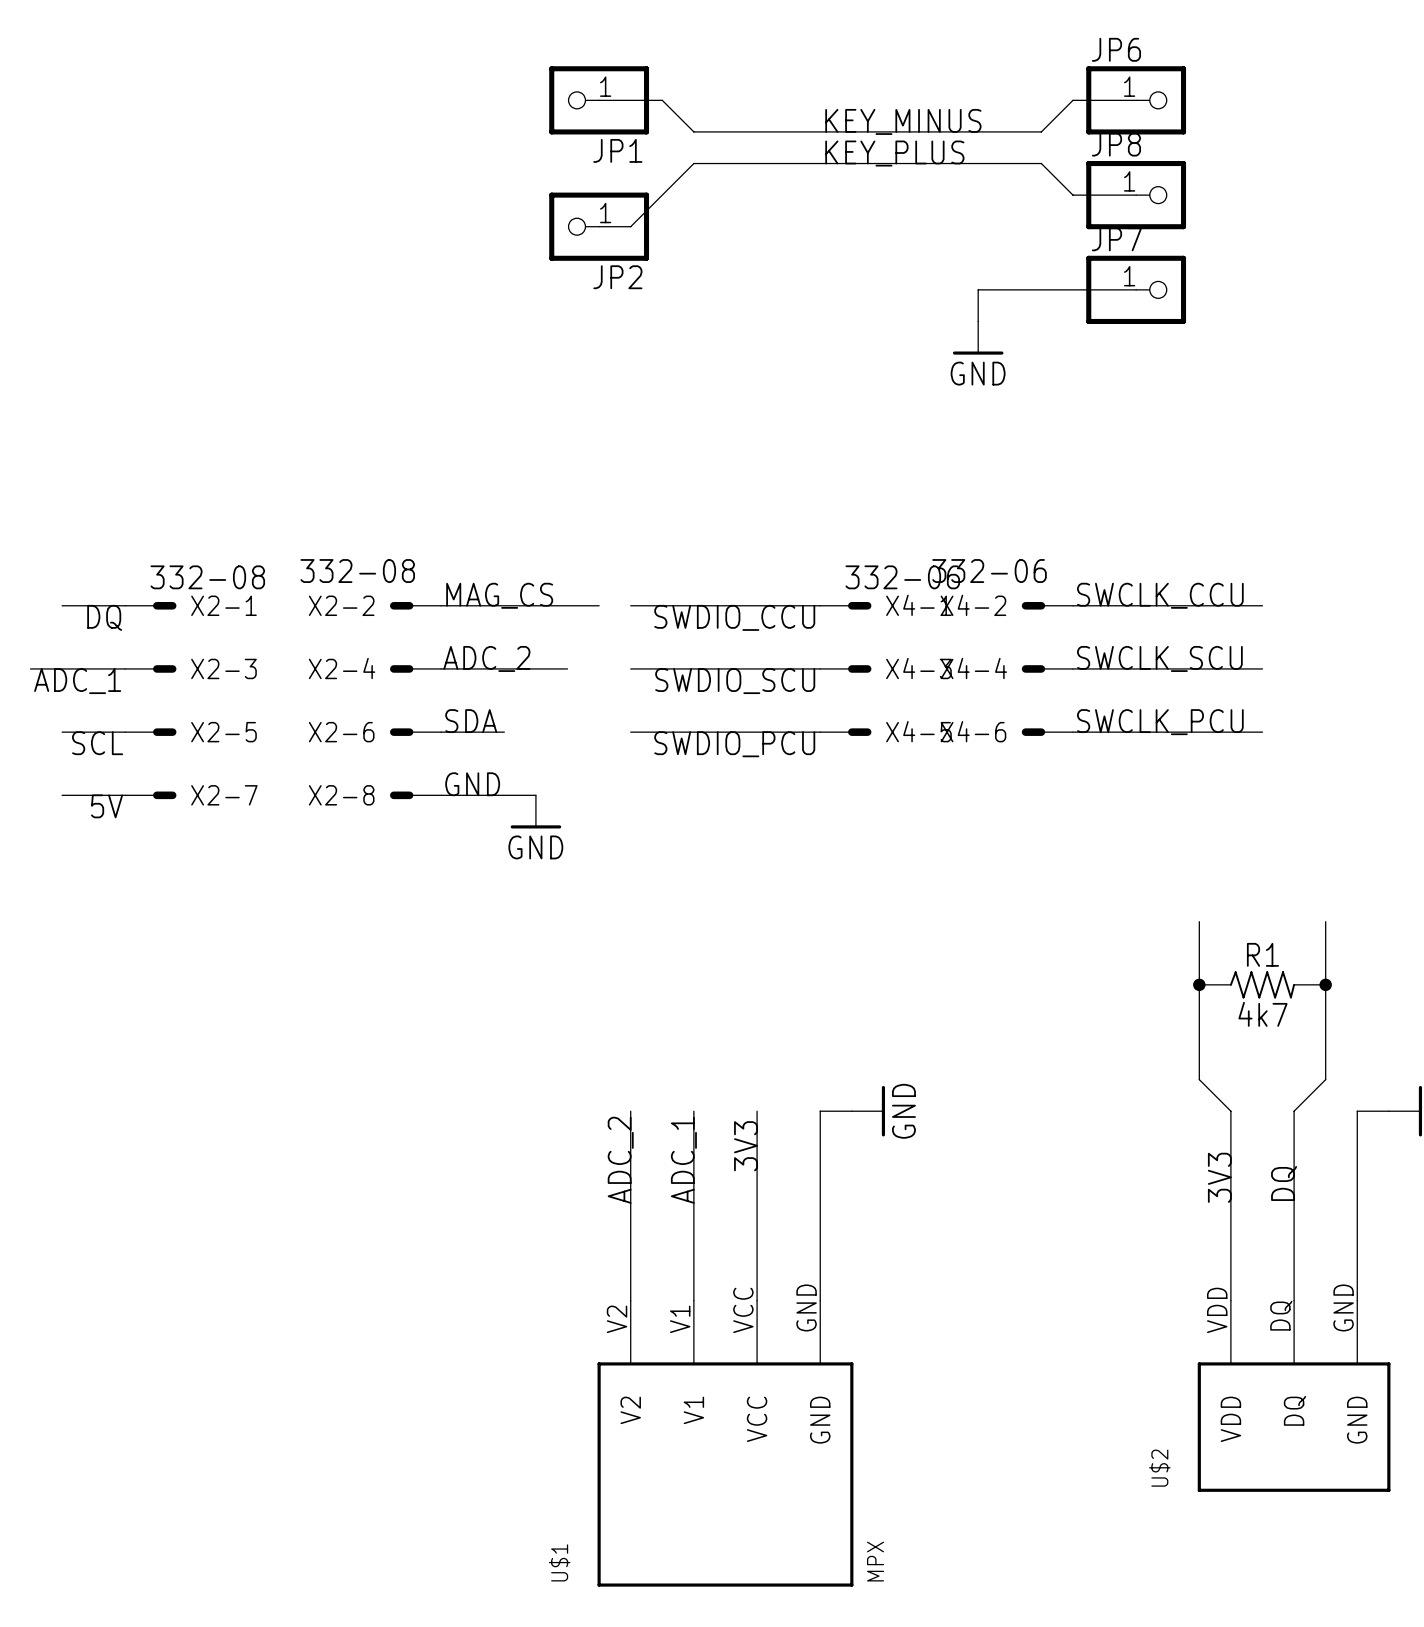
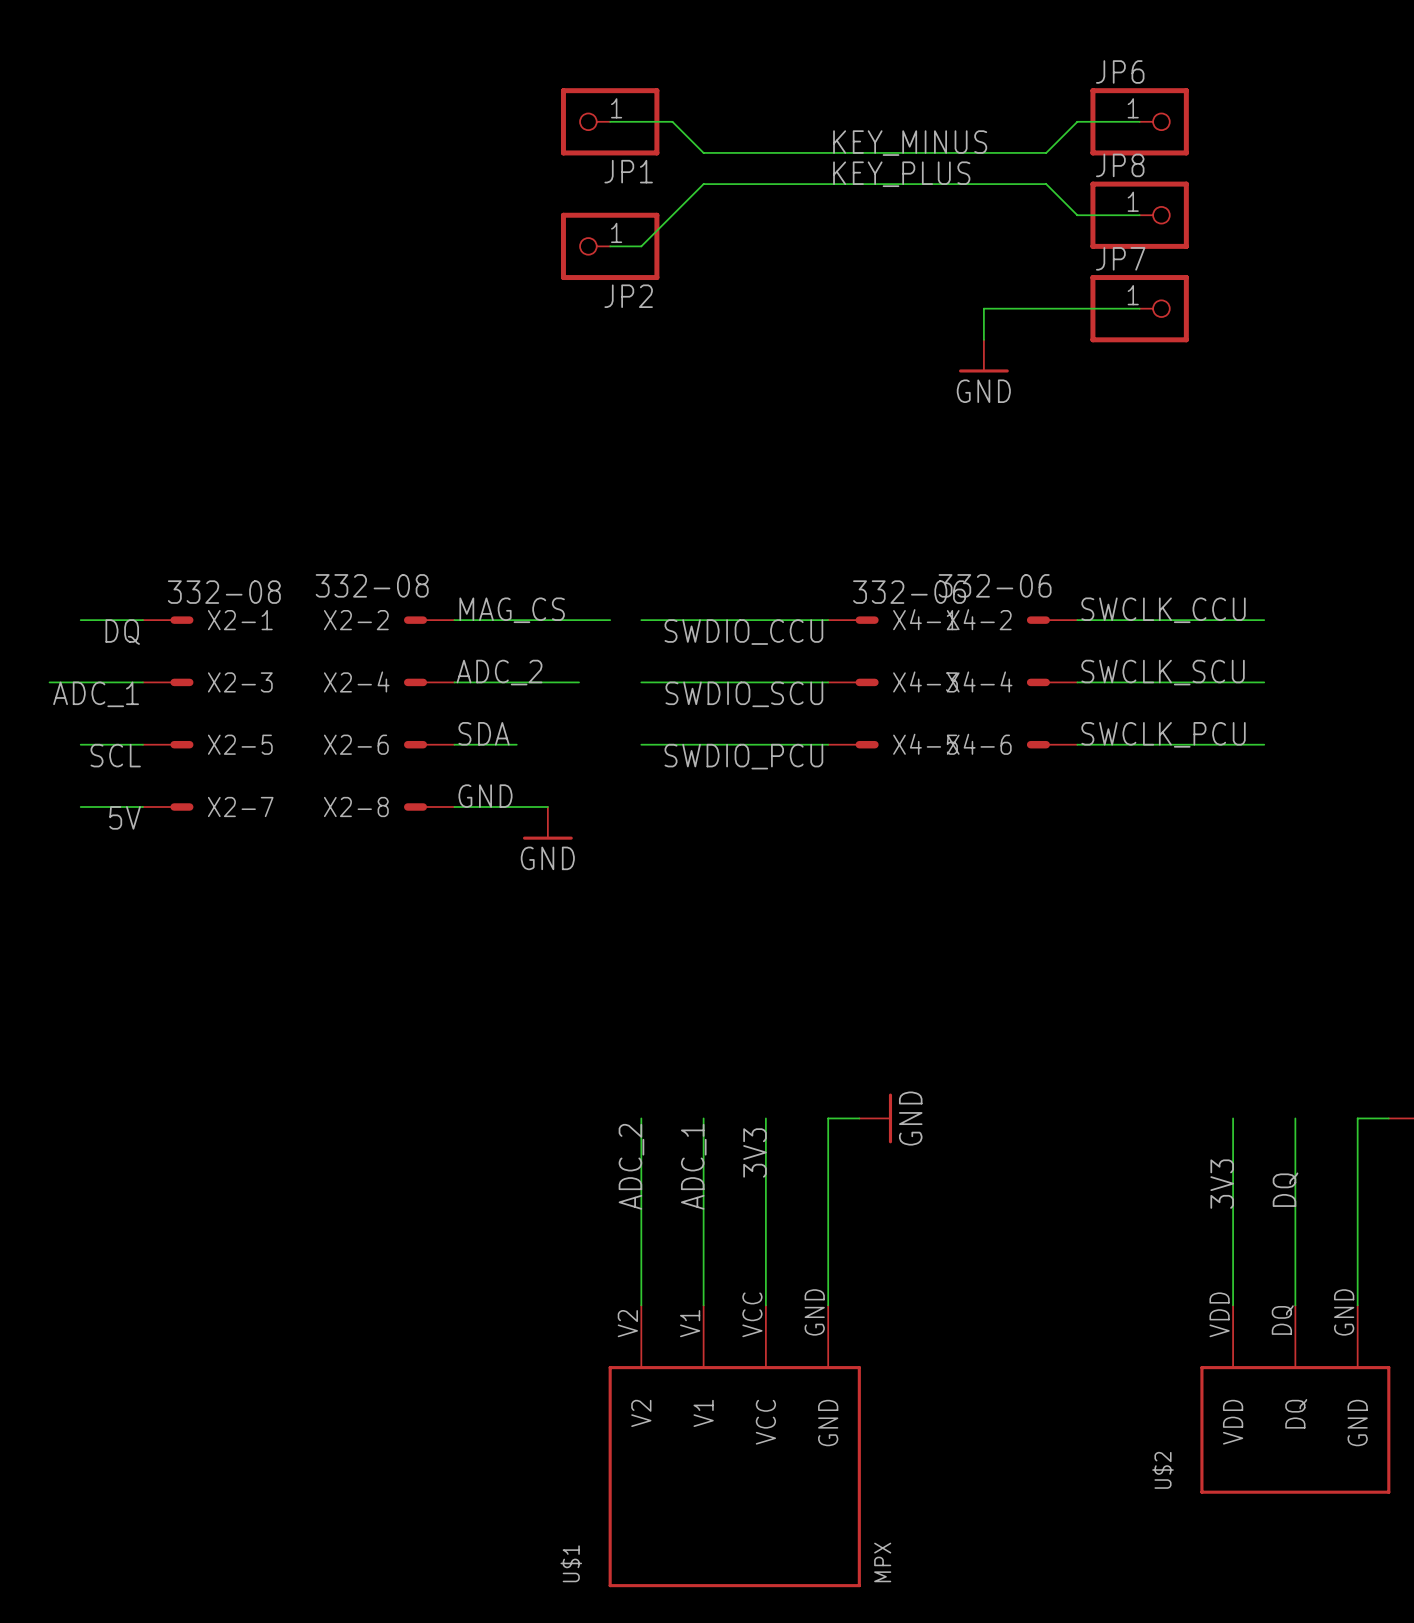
wire: (1199, 921) (1199, 1079) (1230, 1111) -> none
wire: (1325, 921) (1325, 1079) (1294, 1111) -> none
junction: (1199, 984) -> none
R1: 4k7 (1262, 984) -> none
junction: (1325, 984) -> none

